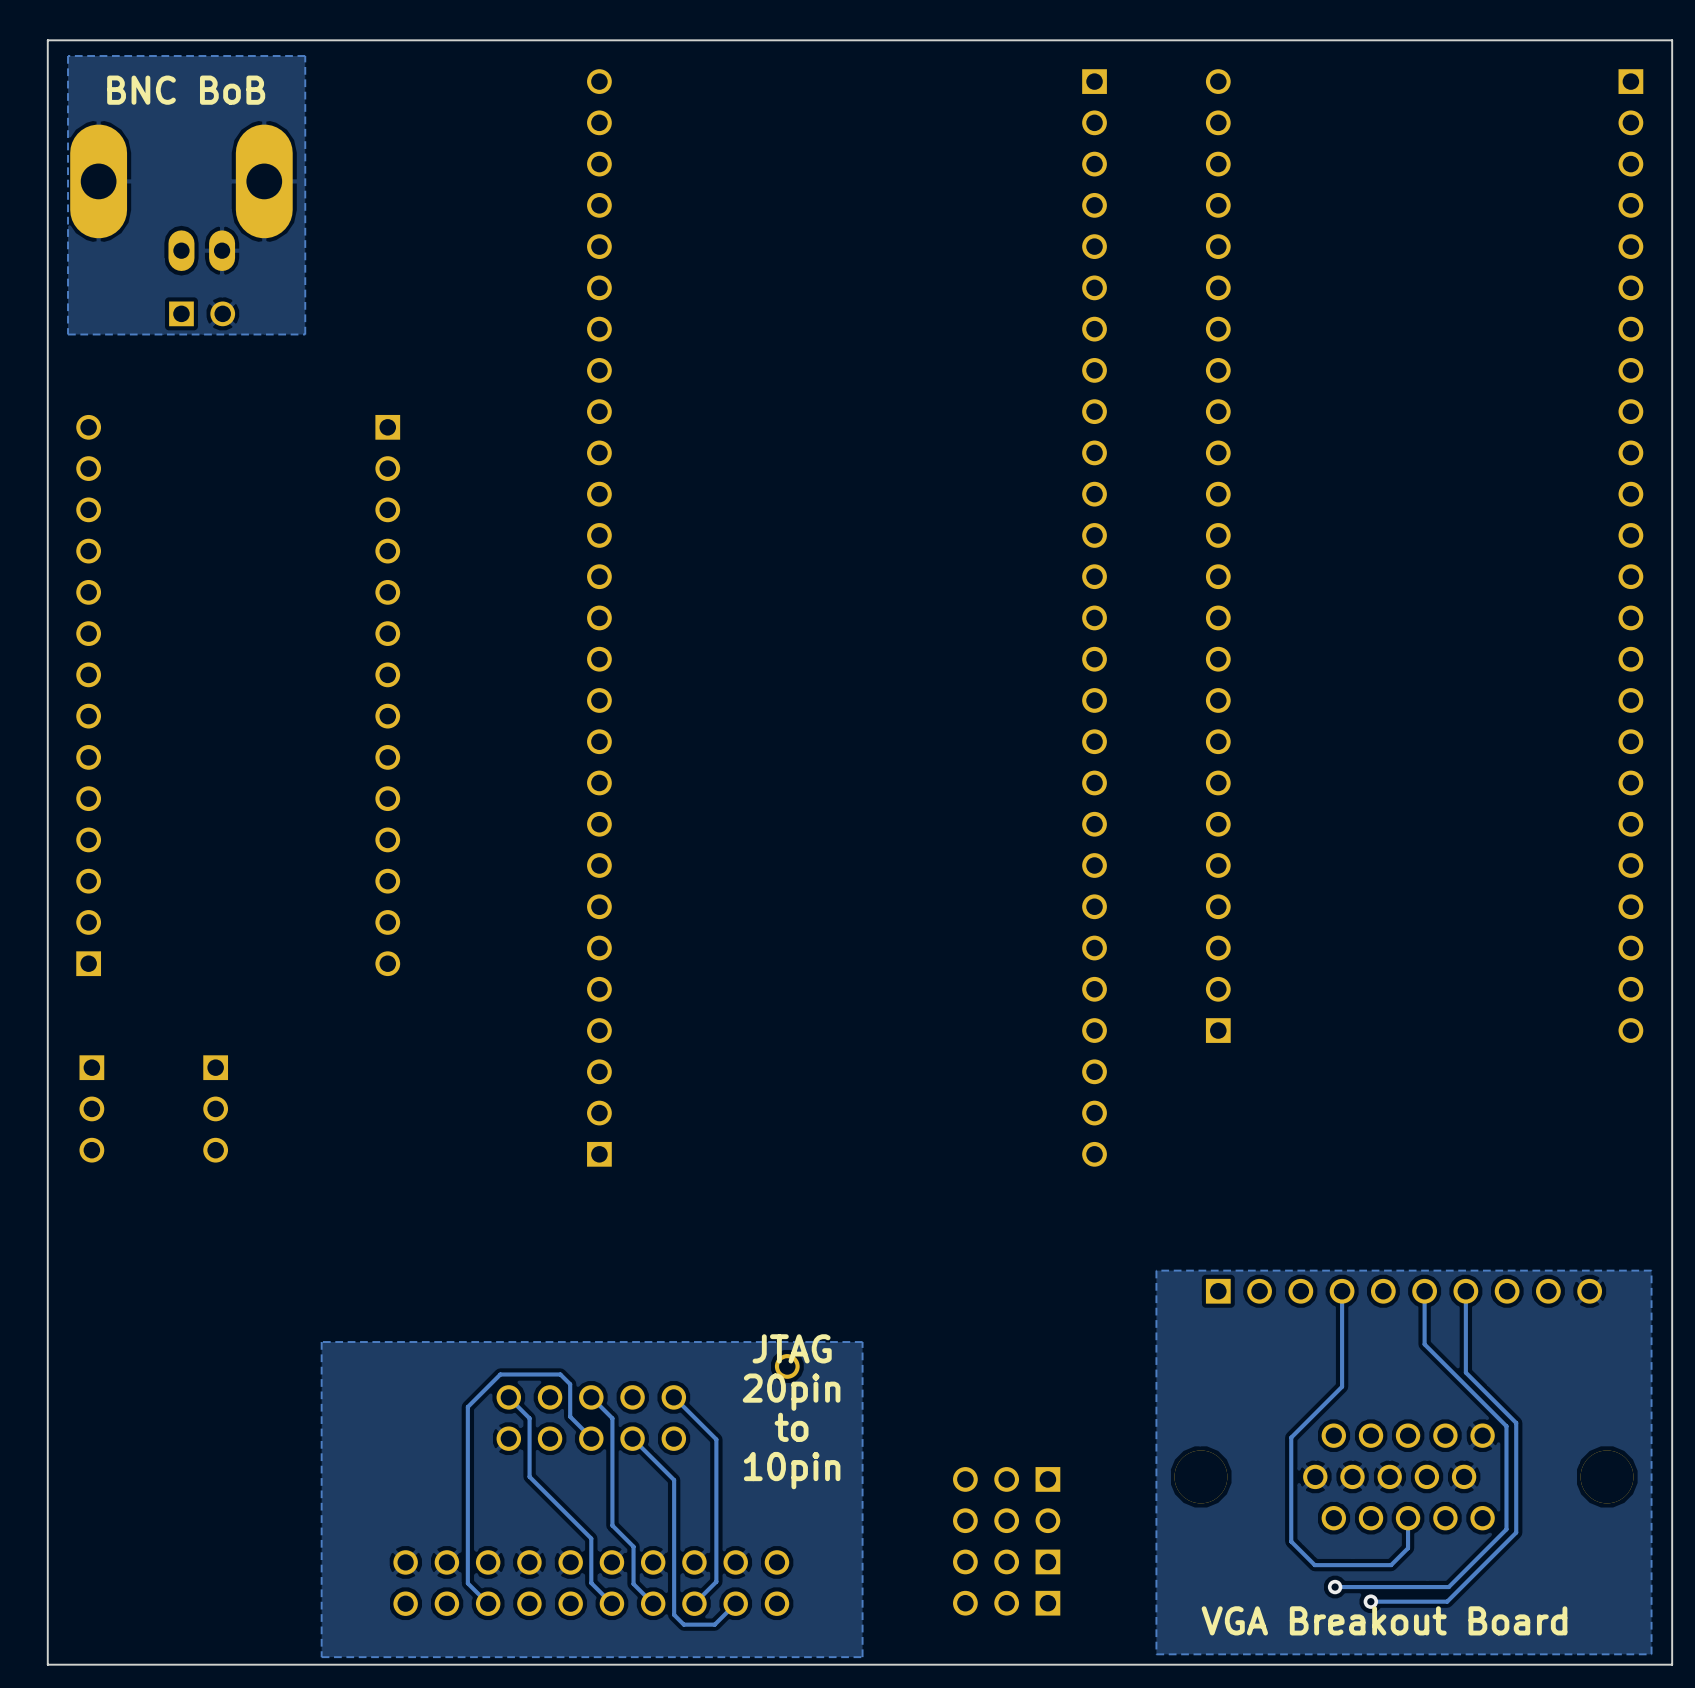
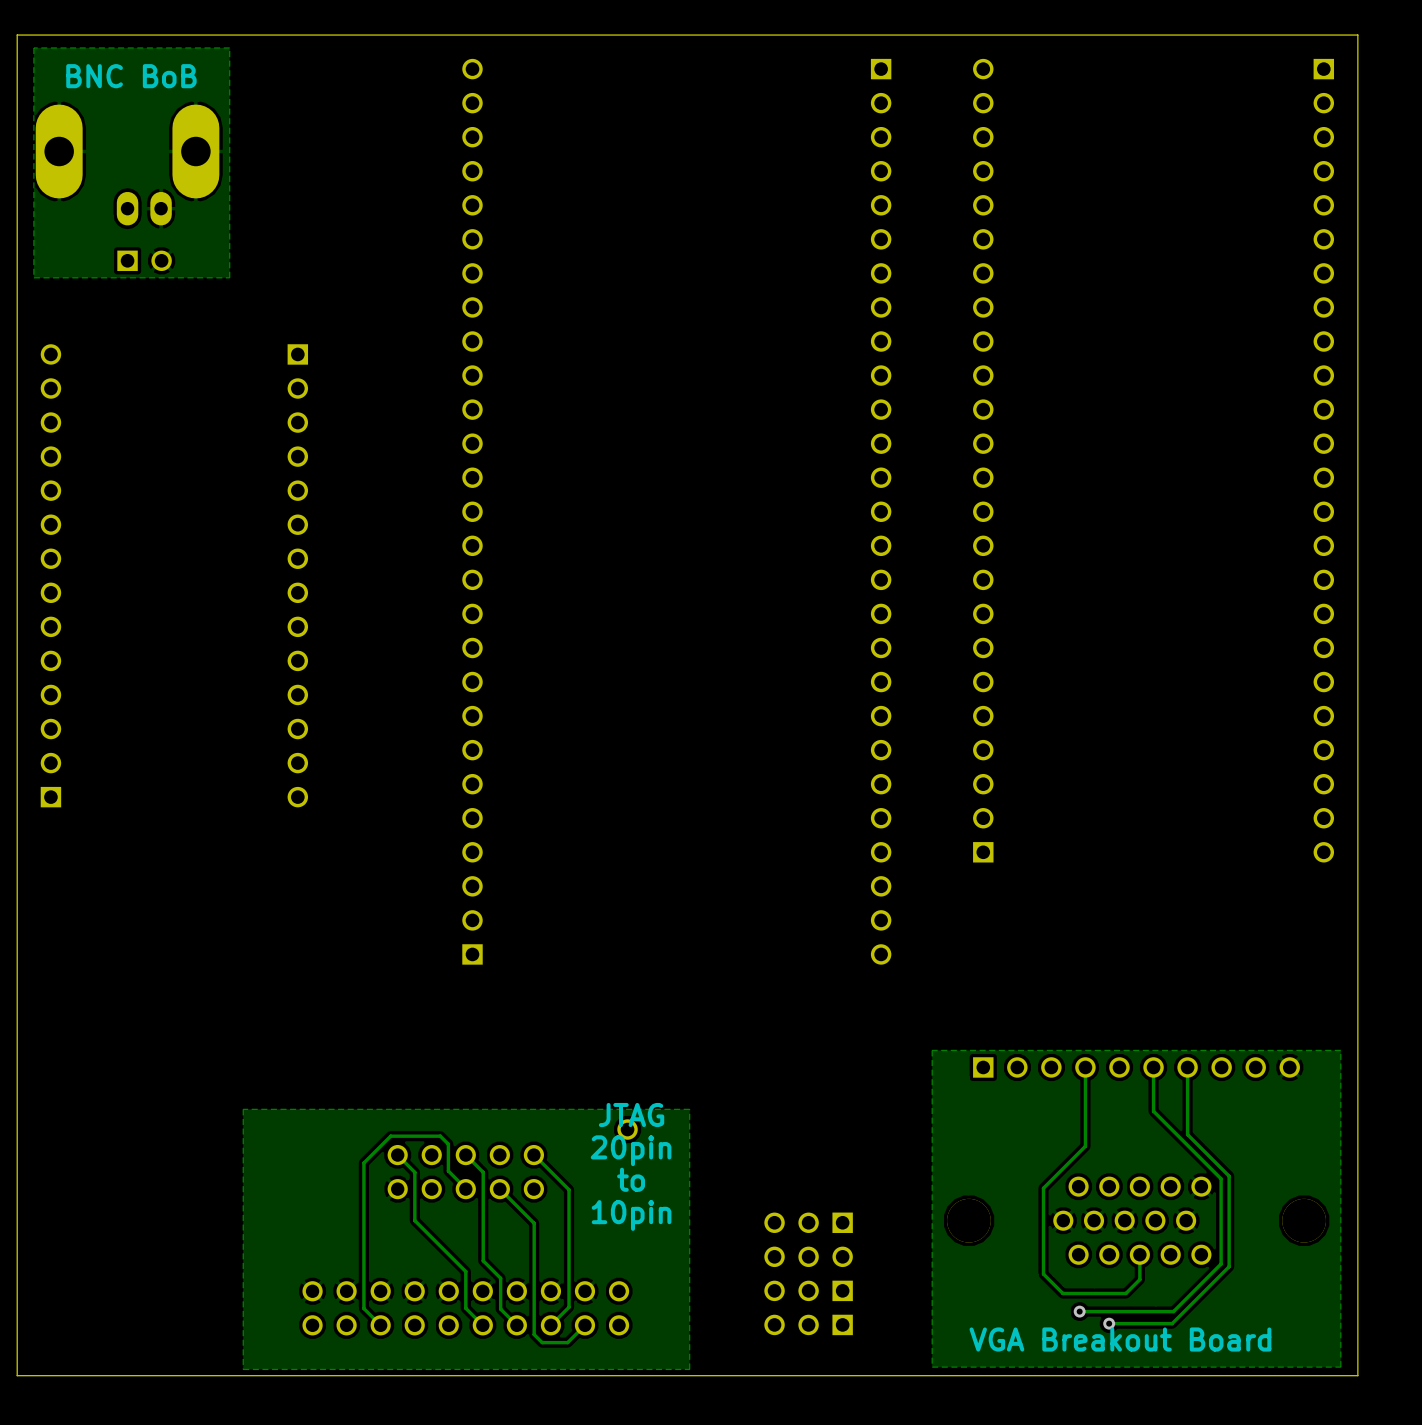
part: (91, 1108) -> none
part: (215, 1108) -> none

